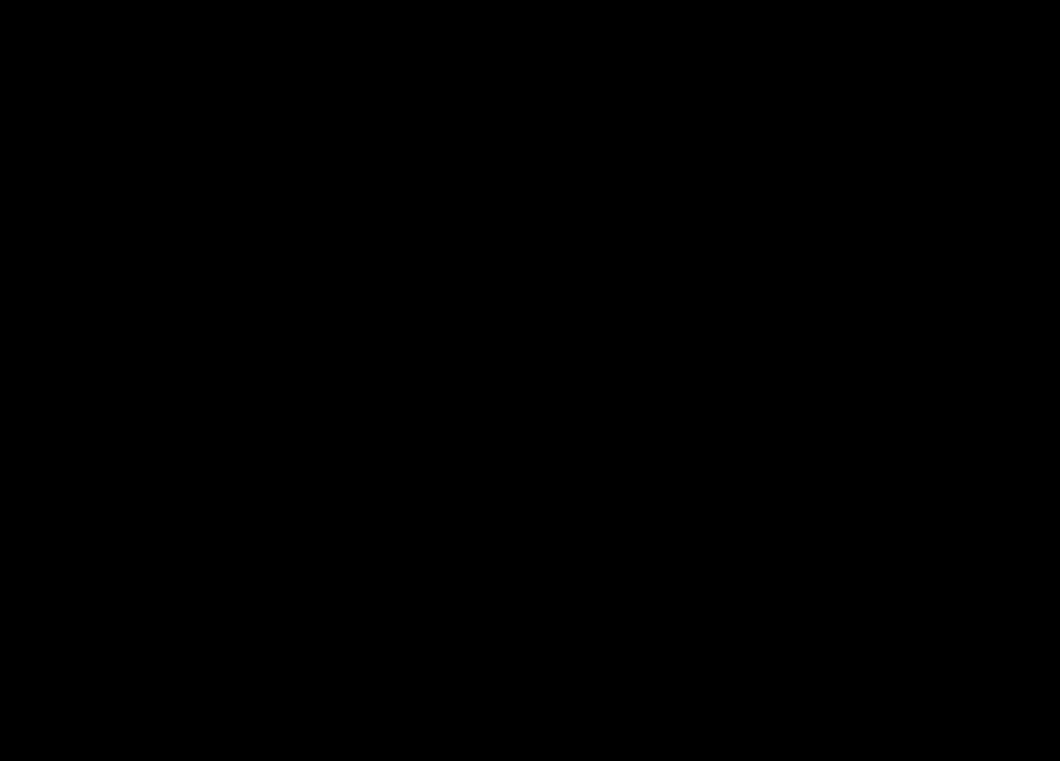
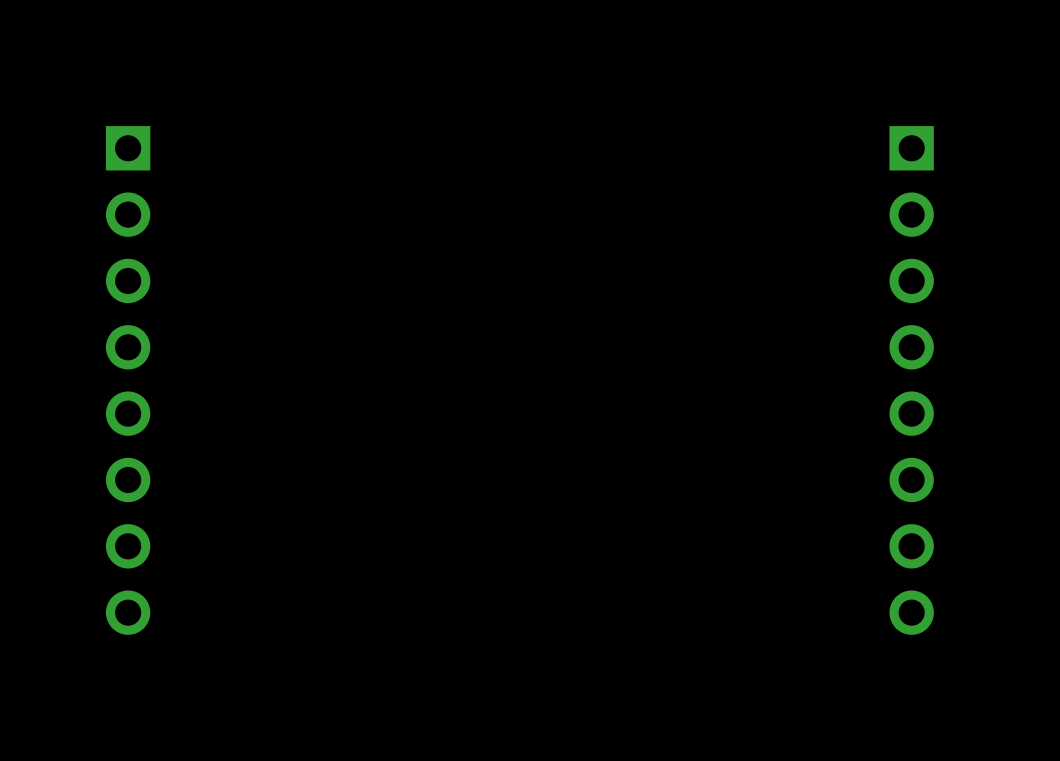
part: none -> (128, 380)
part: none -> (911, 380)

